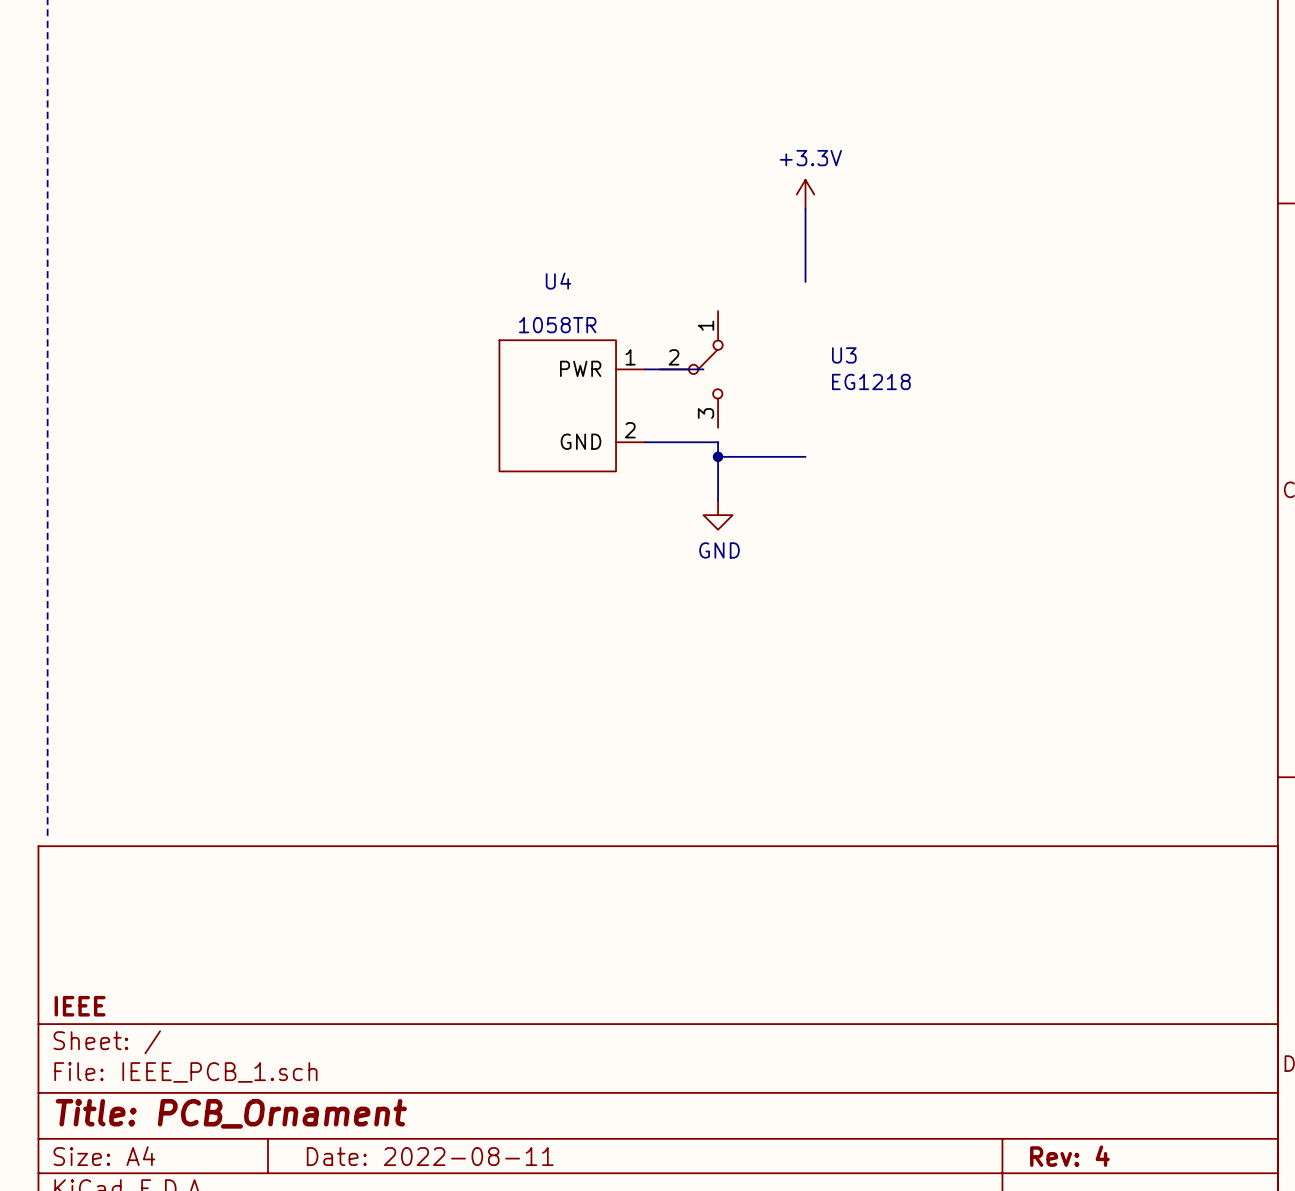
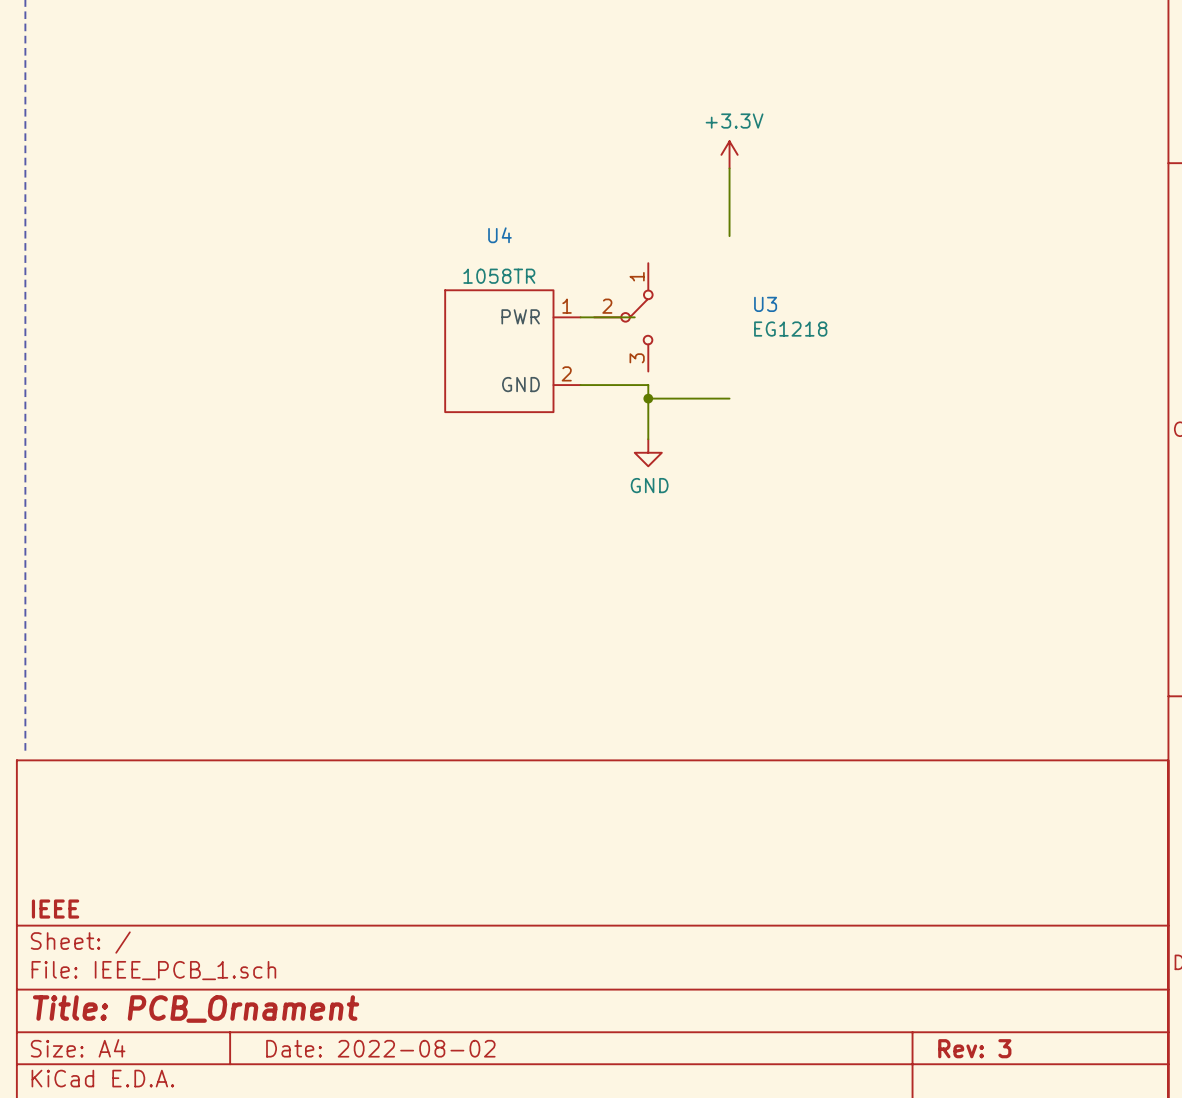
title block: Date: 2022-08-11 (430, 1156) -> Date: 2022-08-02 (380, 1048)
title block: Rev: 4 (1069, 1156) -> Rev: 3 (974, 1048)

